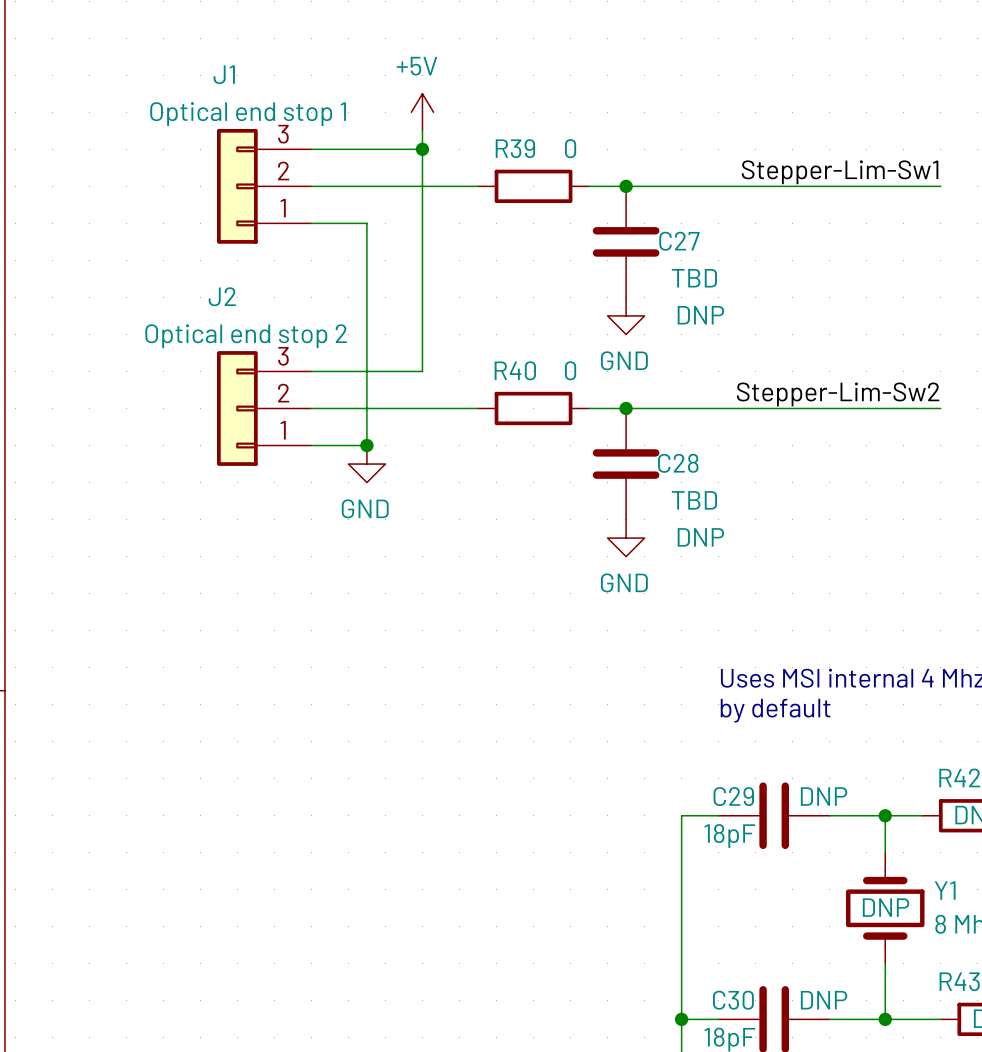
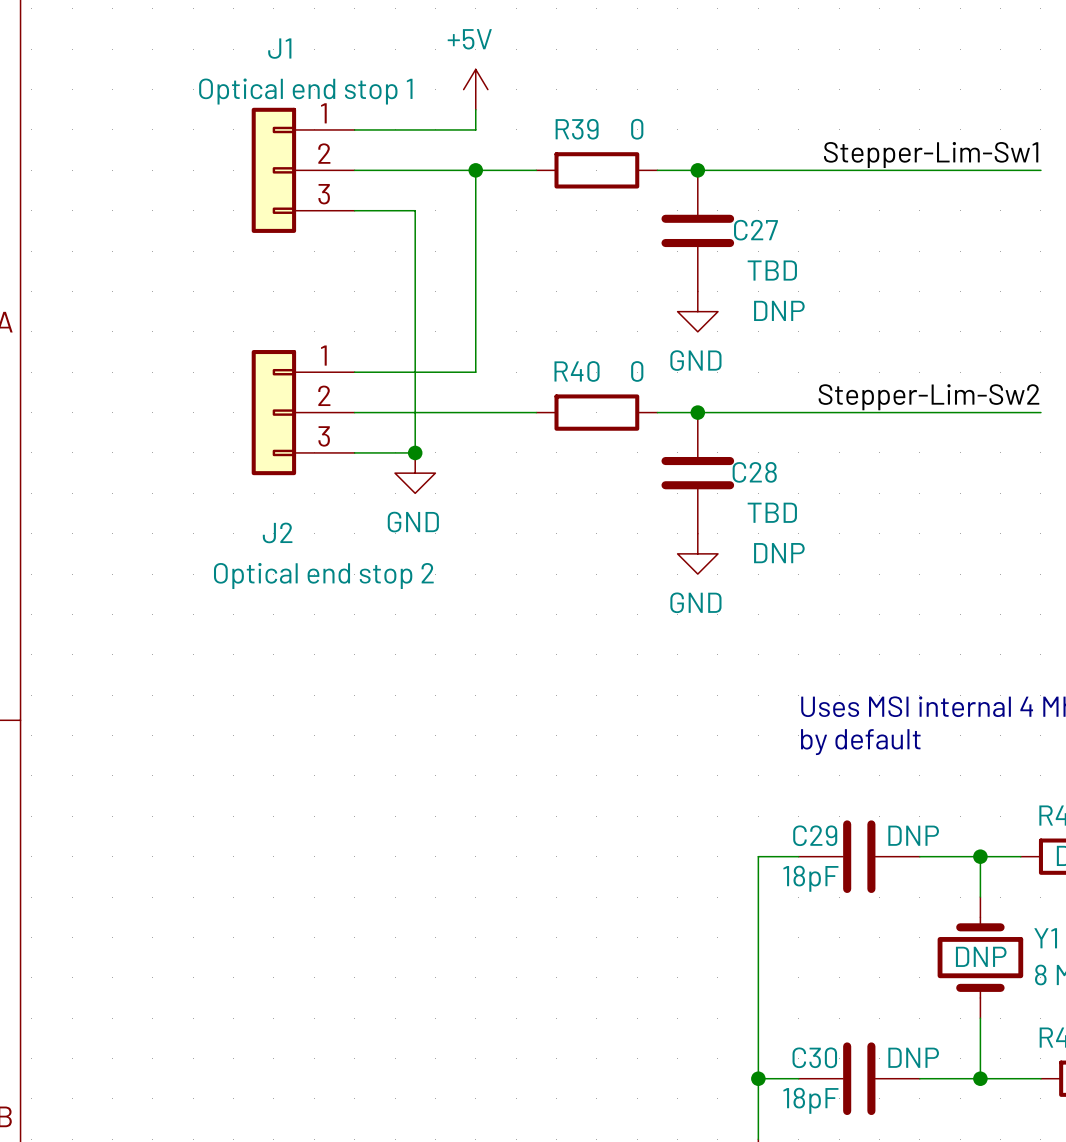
wire: (422, 149) (422, 186) -> none
junction position: (422, 149) -> (475, 170)
J1 flip: as is (237, 186) -> up-down (273, 170)
J2 value position: Optical end stop 2 (246, 336) -> Optical end stop 2 (323, 575)
J2 flip: as is (237, 408) -> up-down (273, 412)

